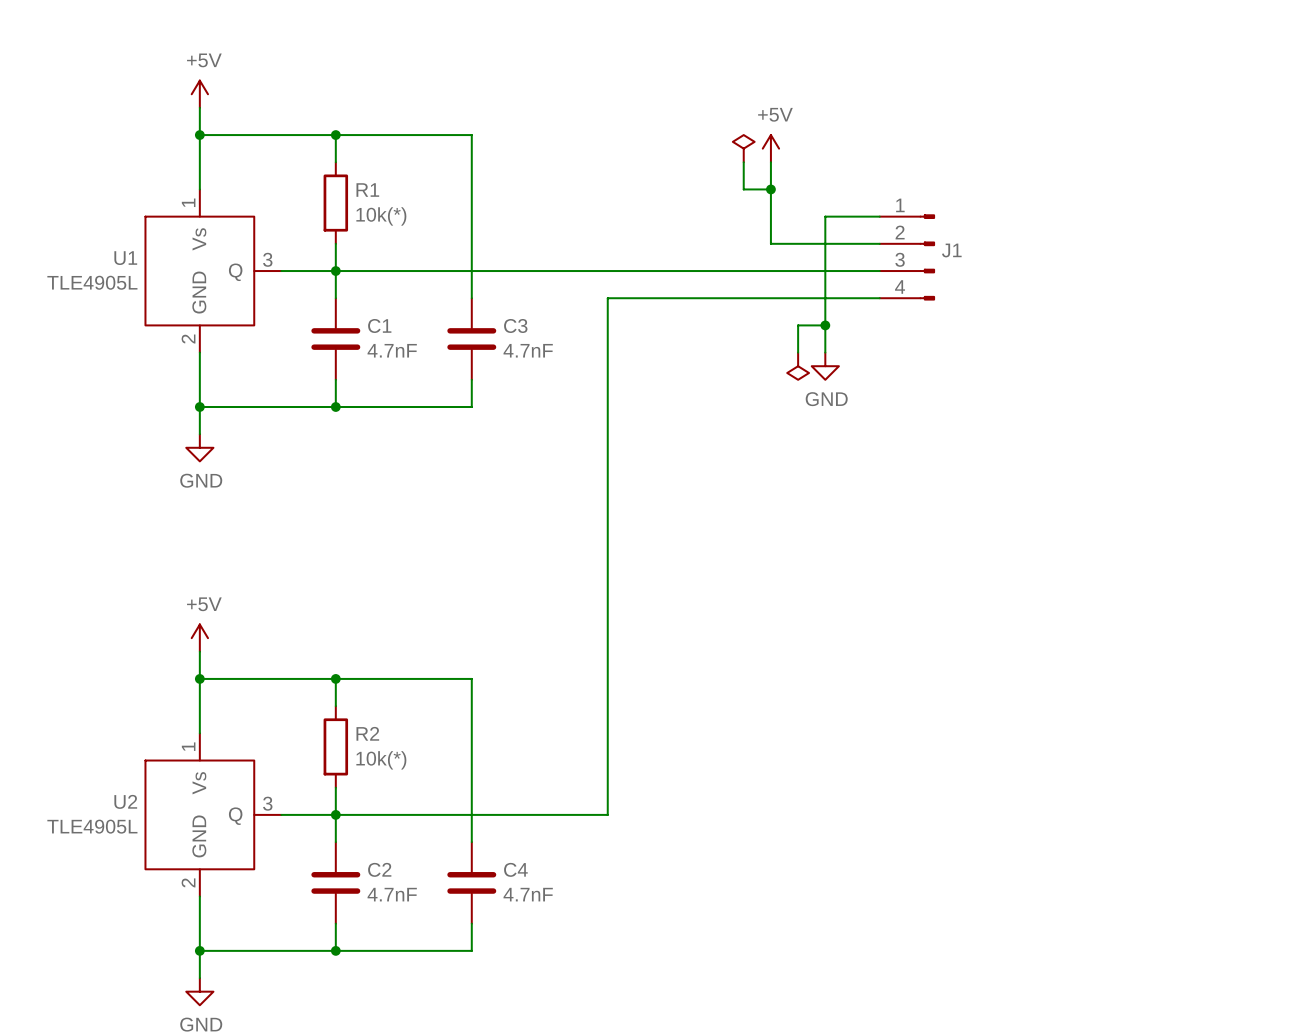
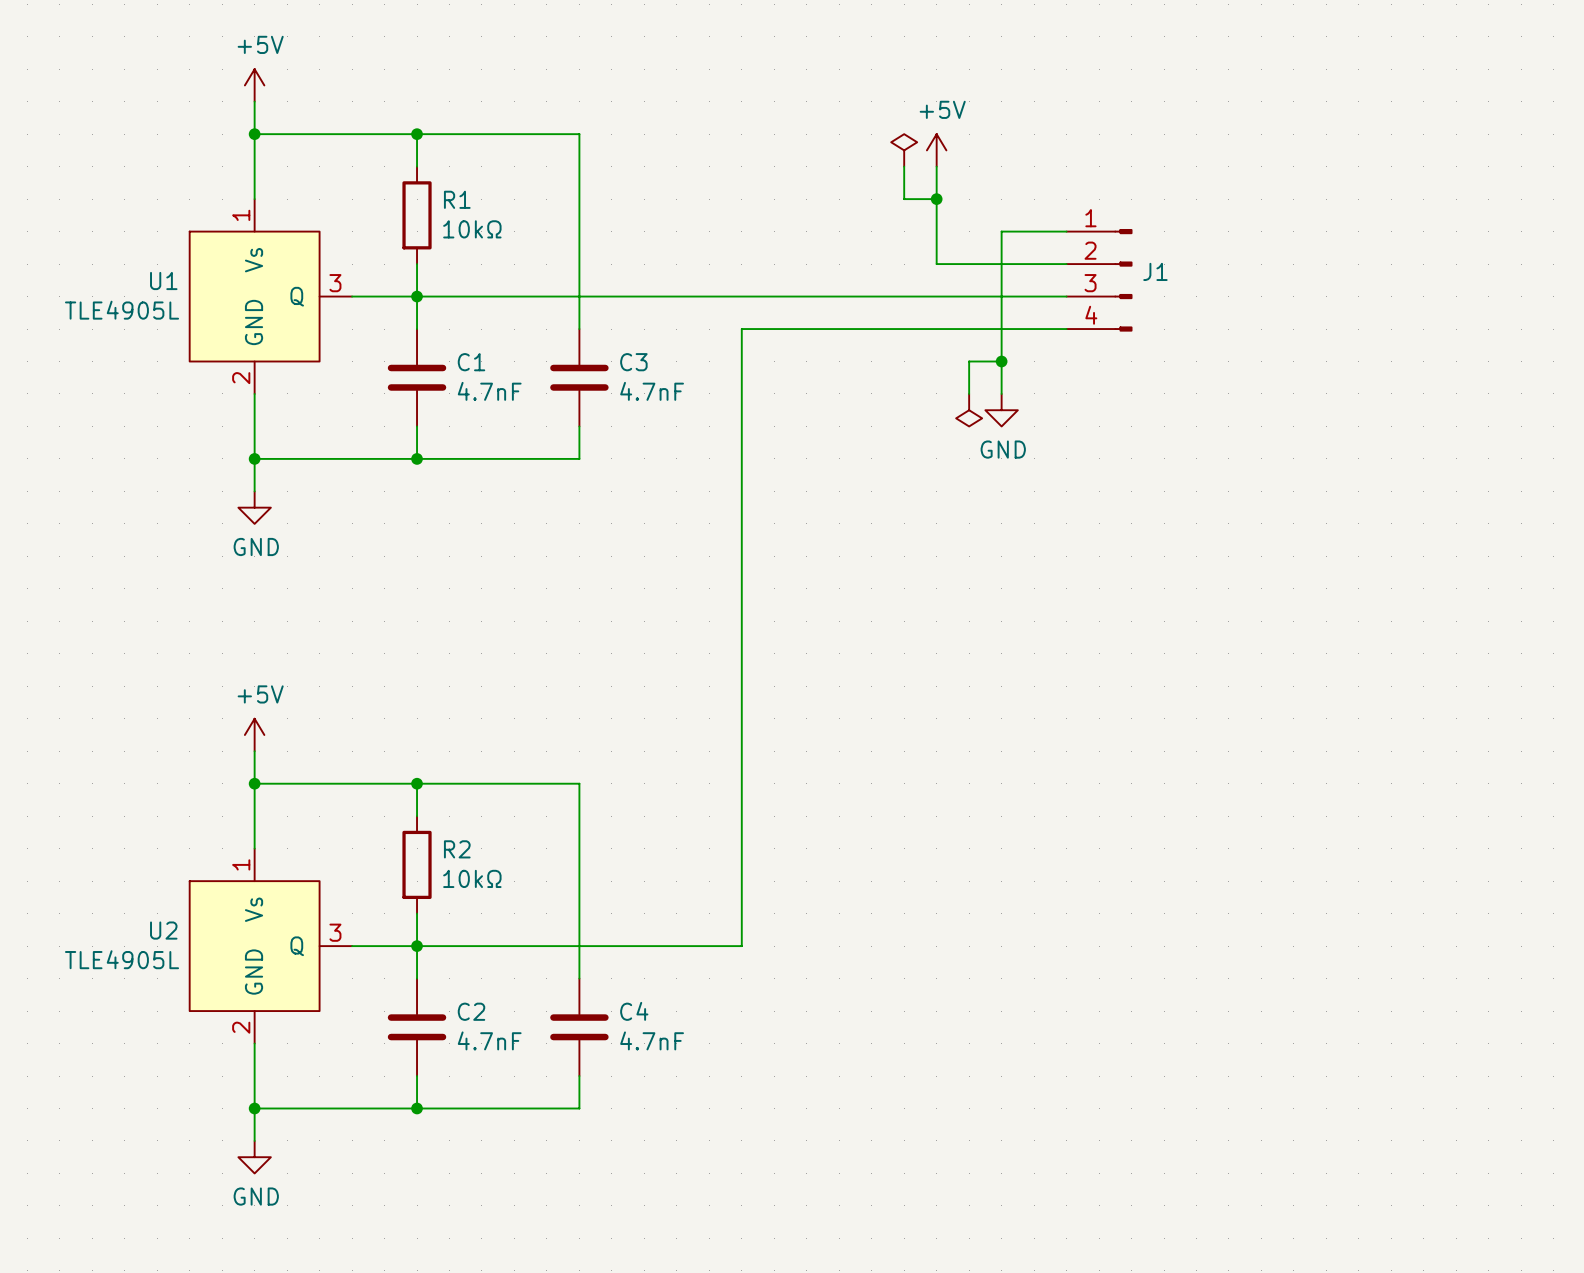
R1 value: 10k(*) (381, 216) -> 10kΩ (472, 229)
R2 value: 10k(*) (381, 760) -> 10kΩ (472, 878)

